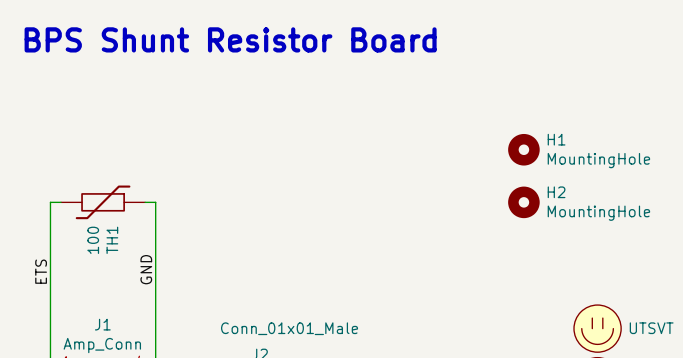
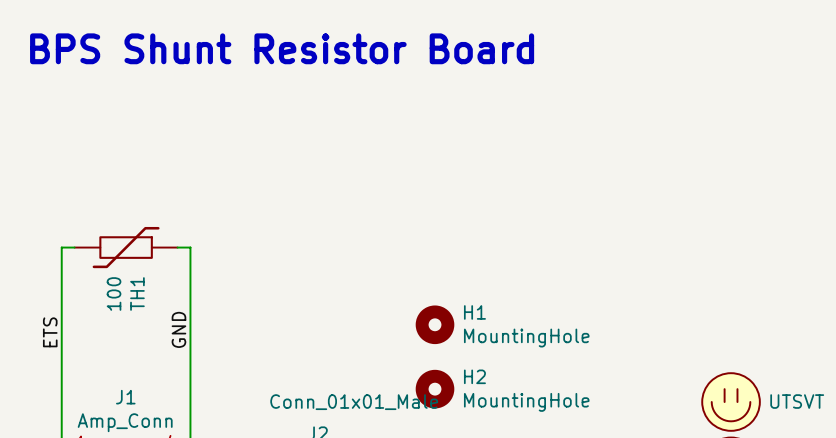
H1 position: (523, 149) -> (435, 324)
H2 position: (523, 202) -> (435, 389)

